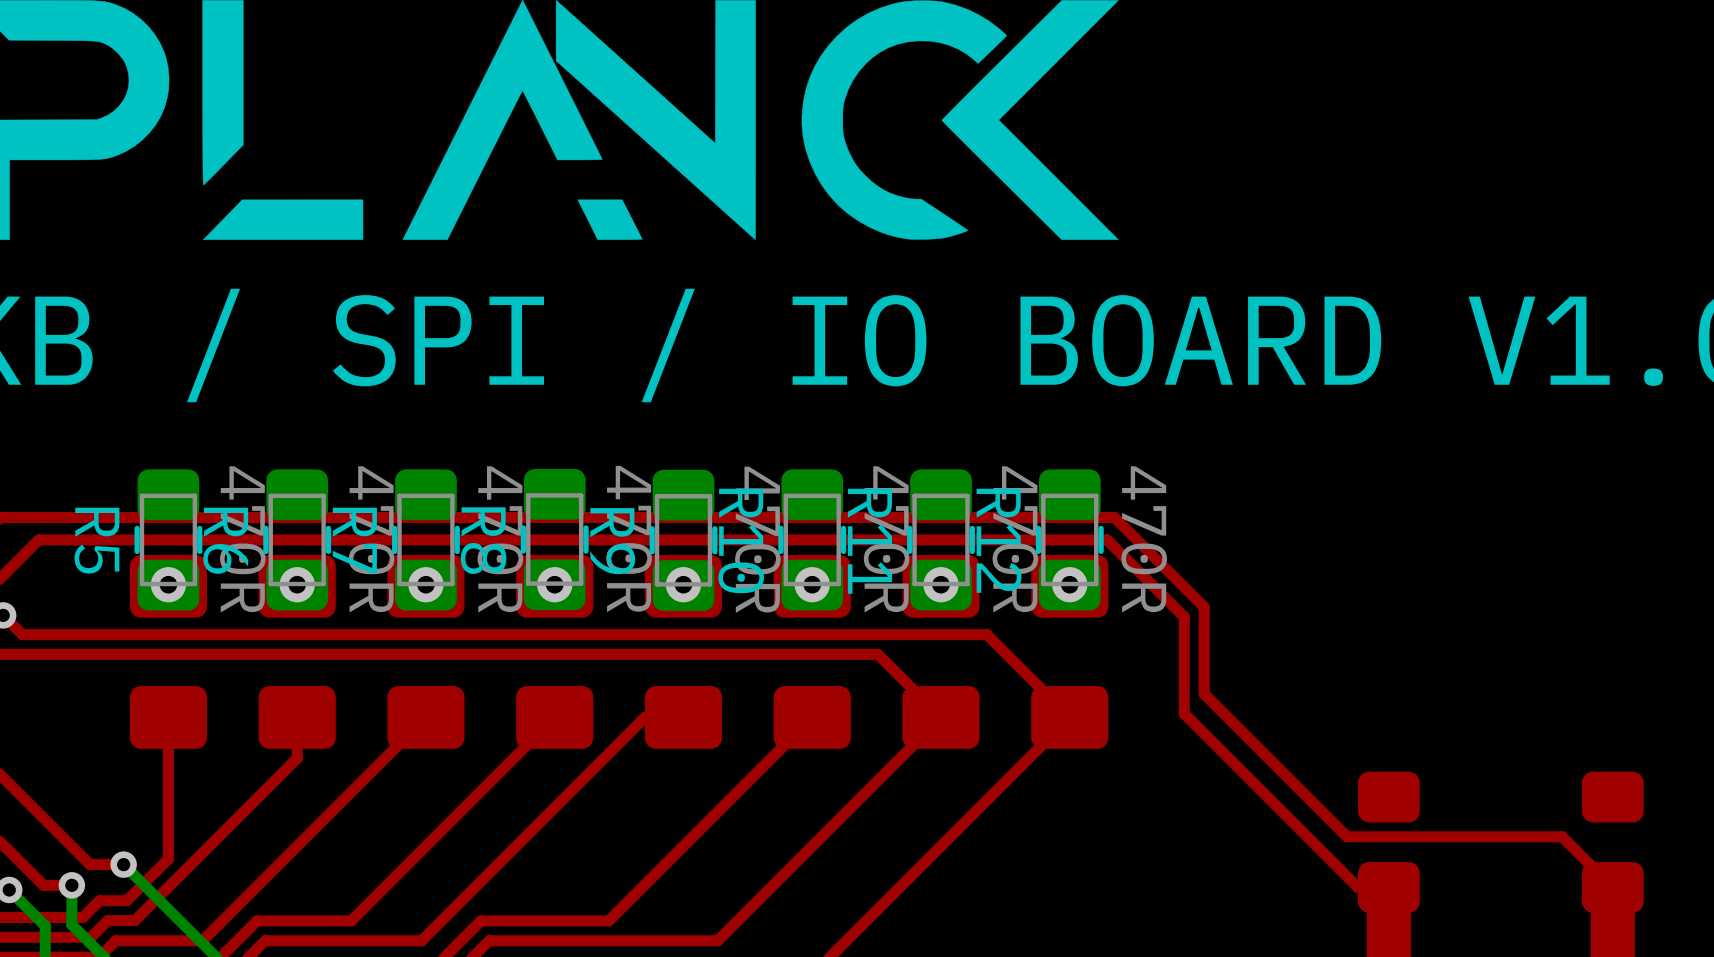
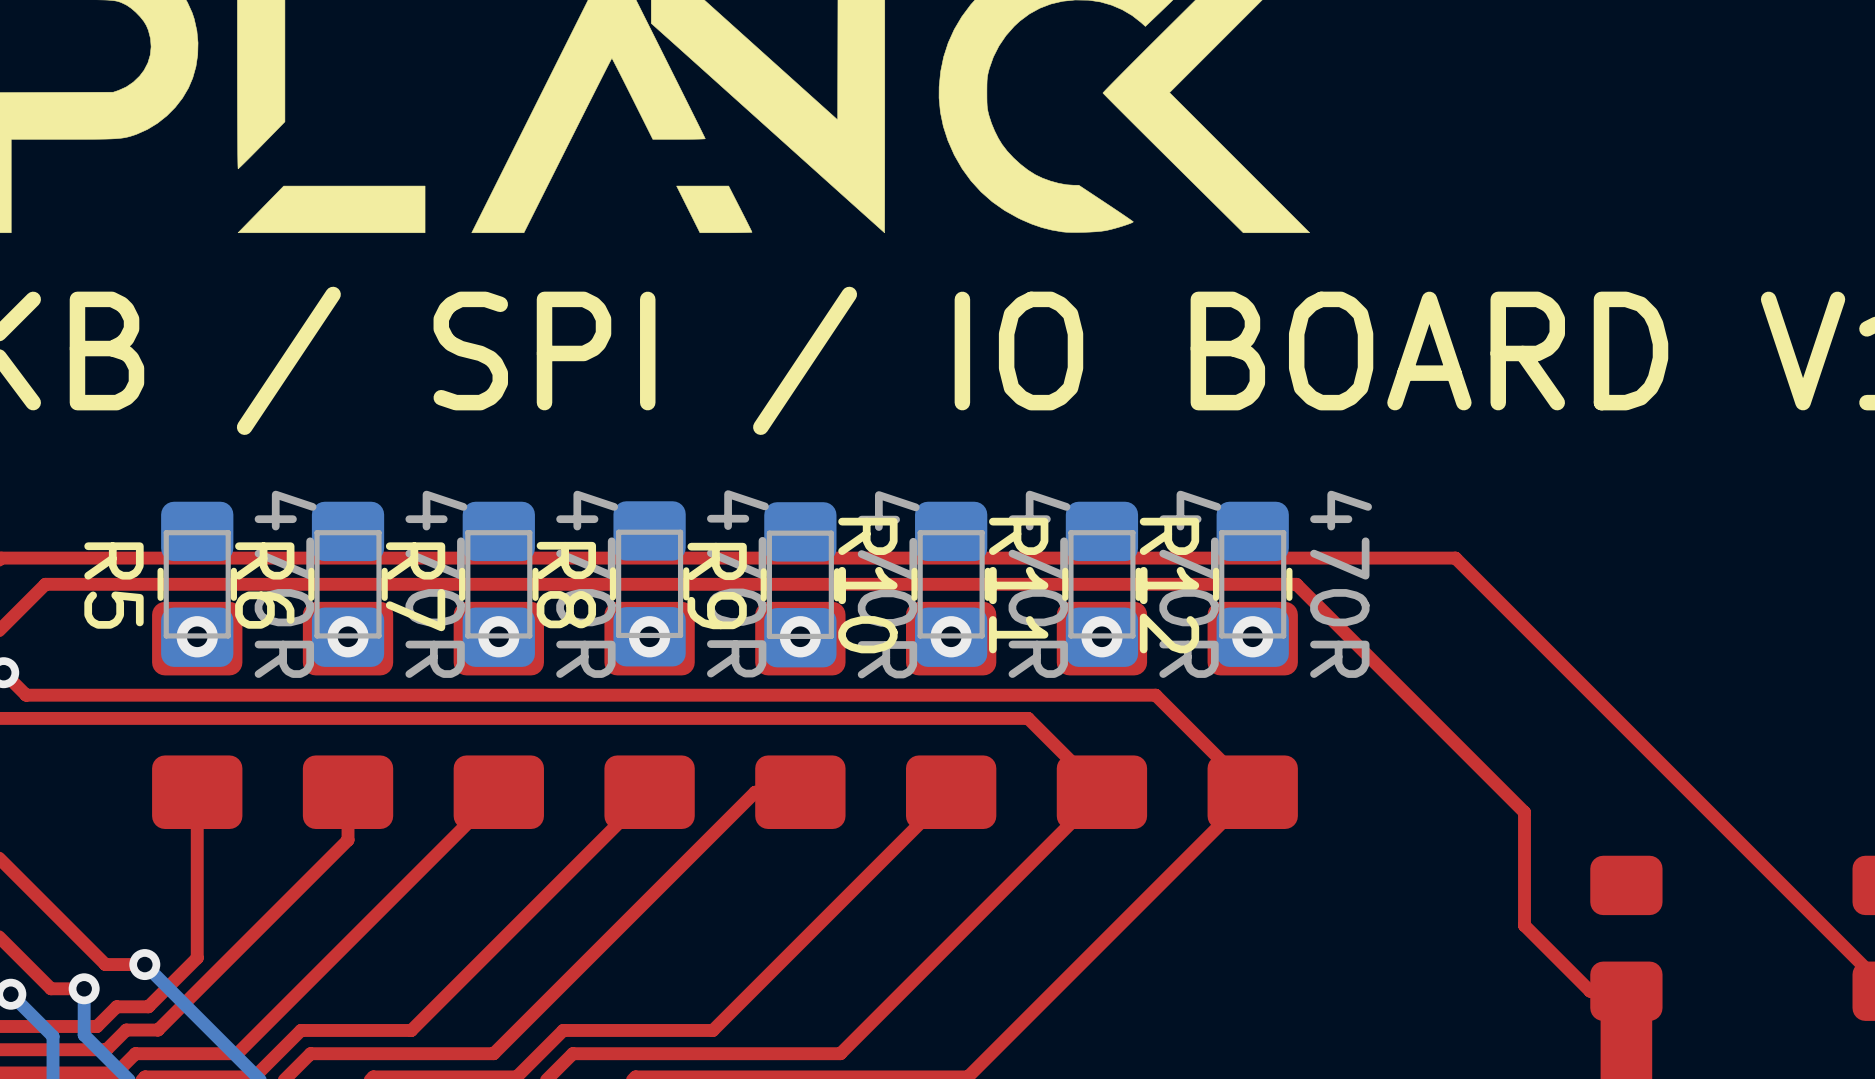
top track: (1114, 517) (1204, 607) (1204, 693) (1346, 836) (1562, 836) -> (1305, 558) (1455, 558) (1829, 931)
top track: (1184, 617) (1184, 713) (1301, 831) -> (1386, 674) (1524, 812) (1524, 925)

